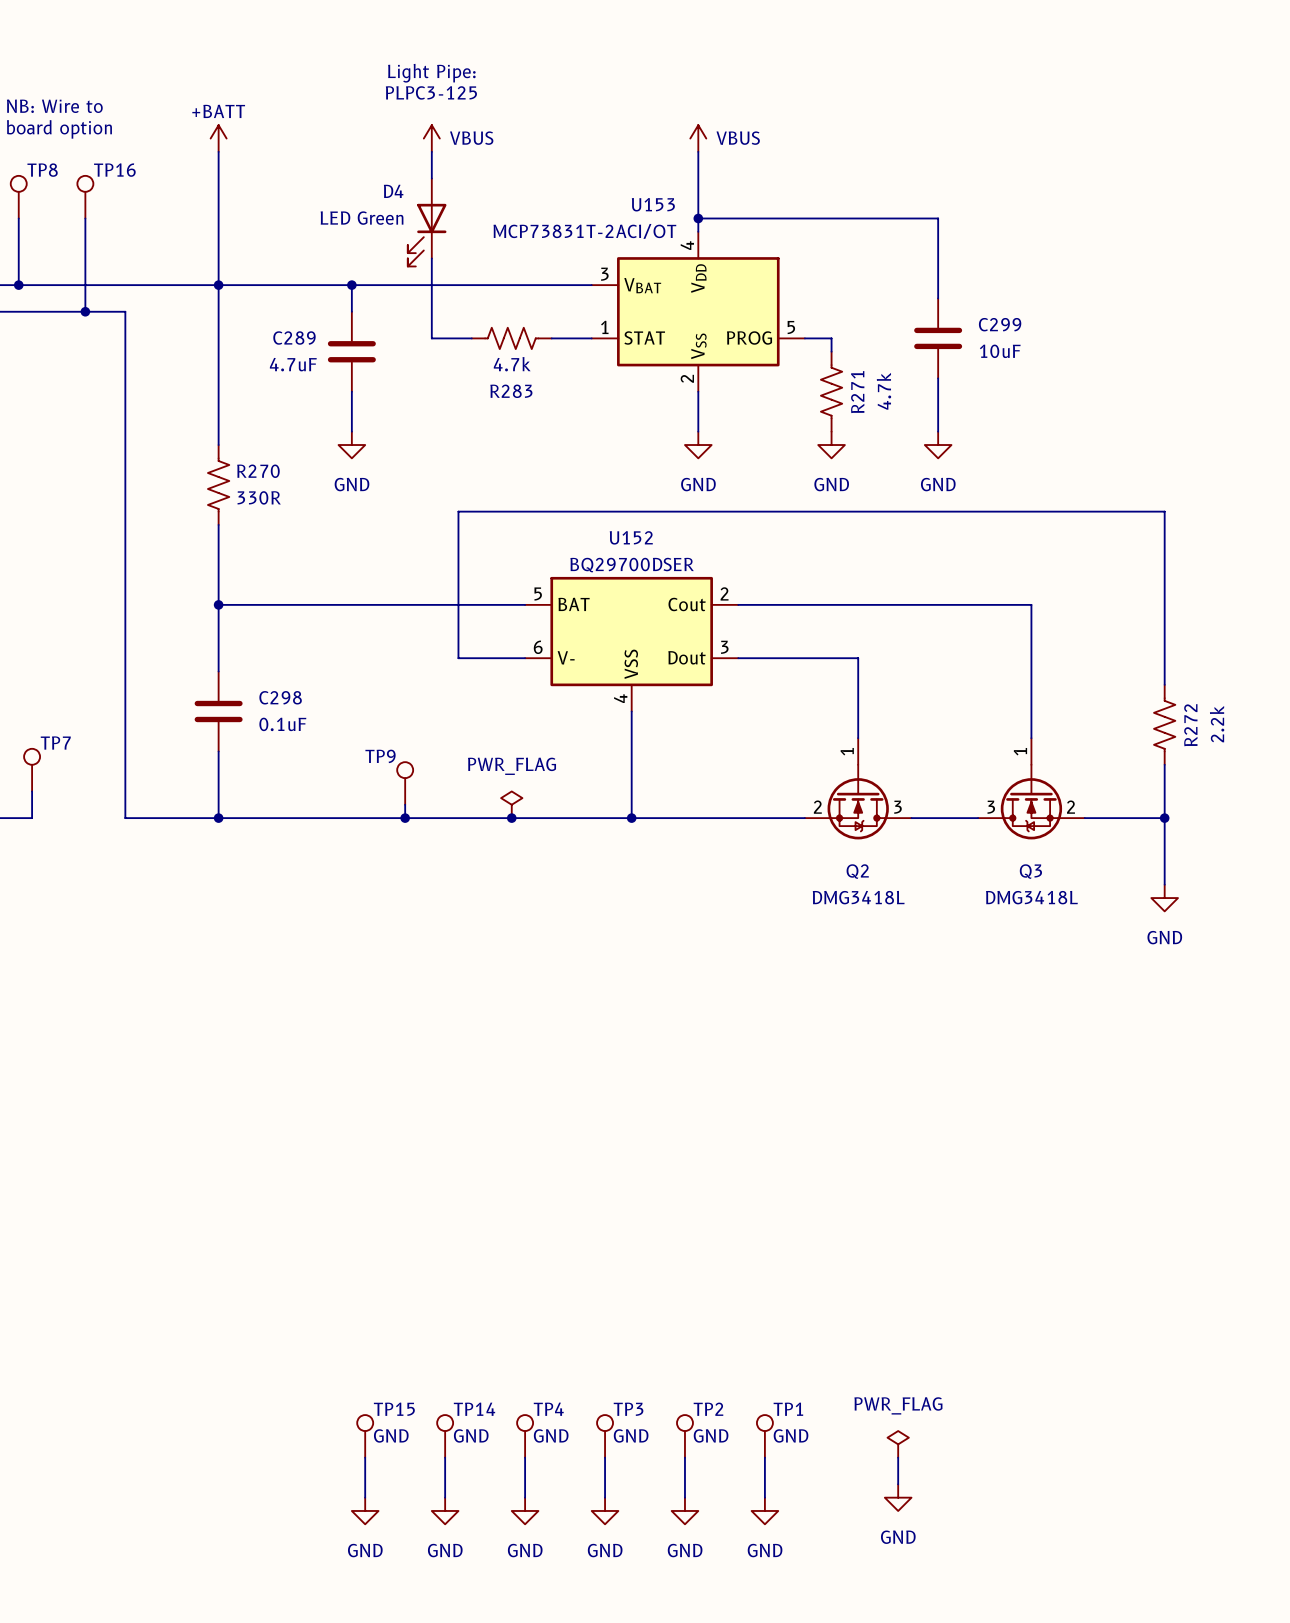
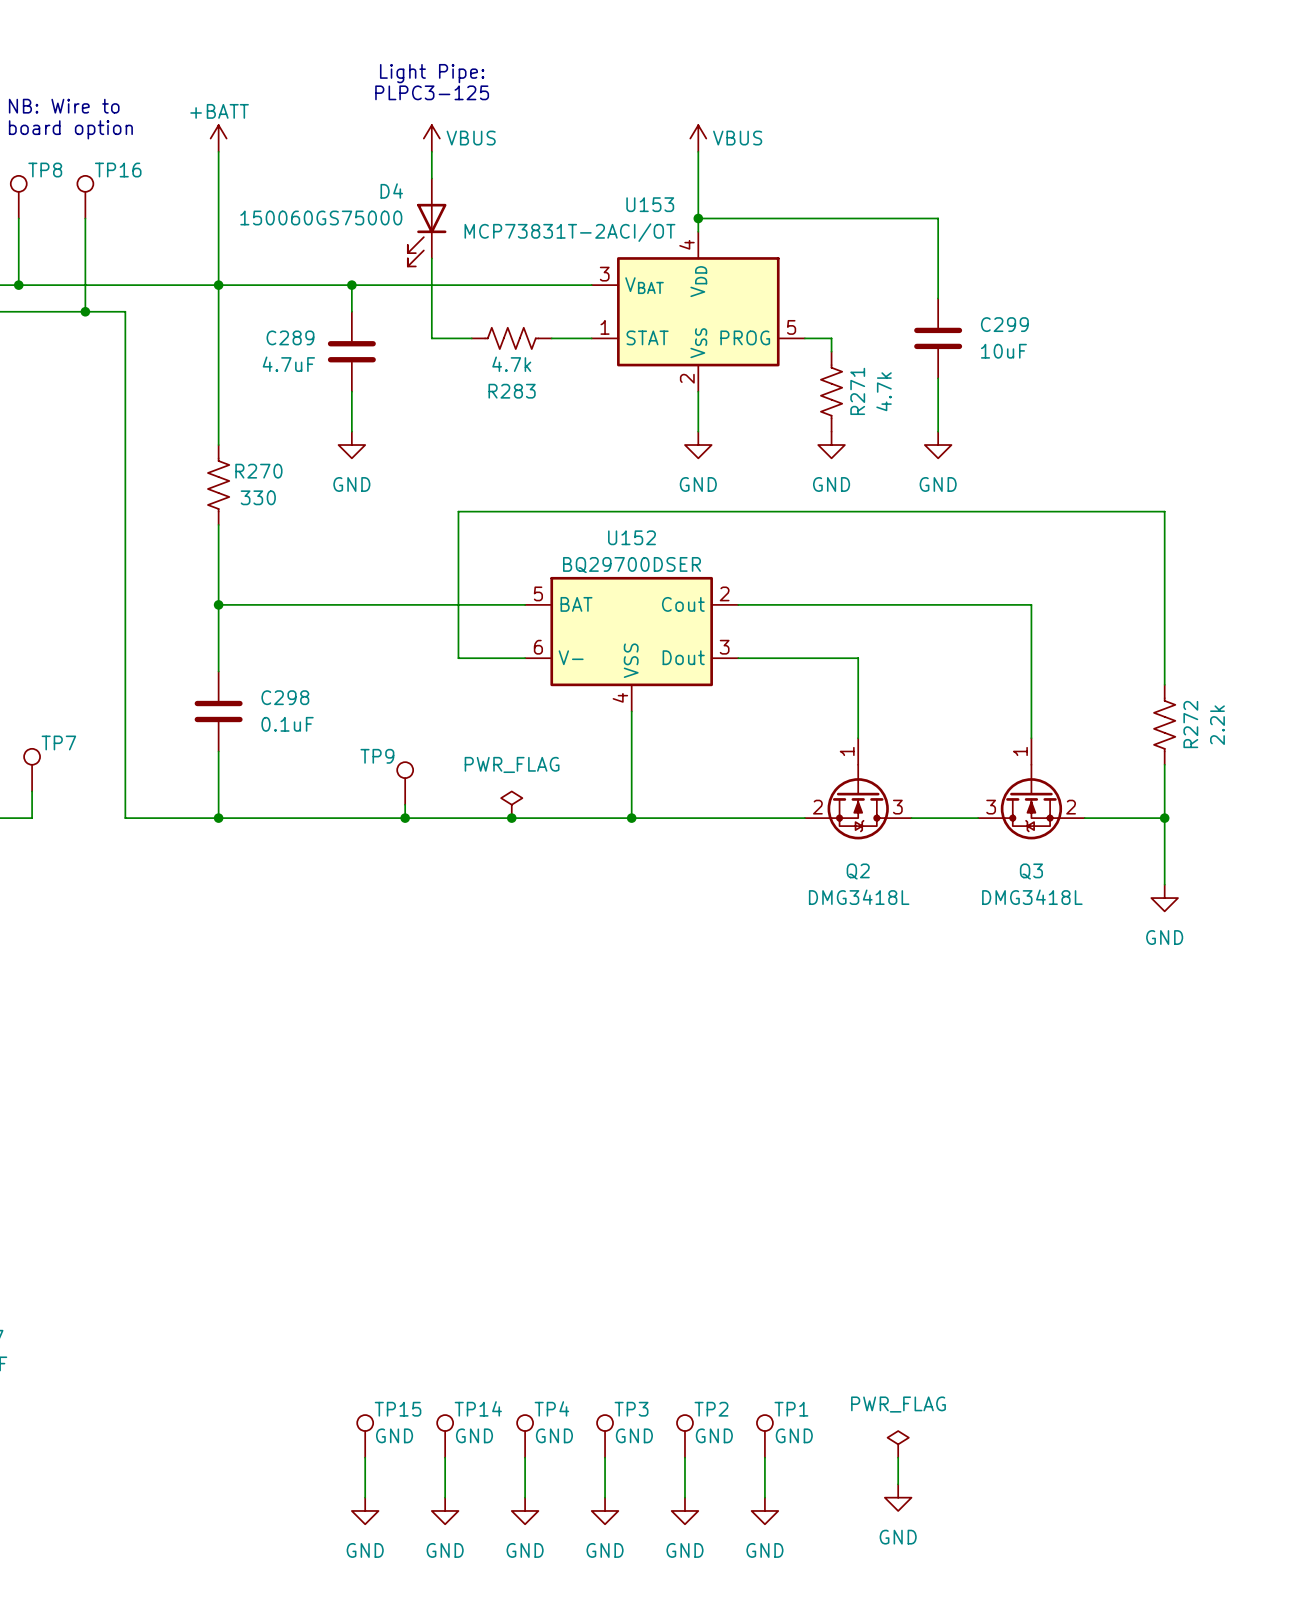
D4 value: LED Green (362, 218) -> 150060GS75000 (321, 217)
R270 value: 330R (259, 497) -> 330 (258, 497)

